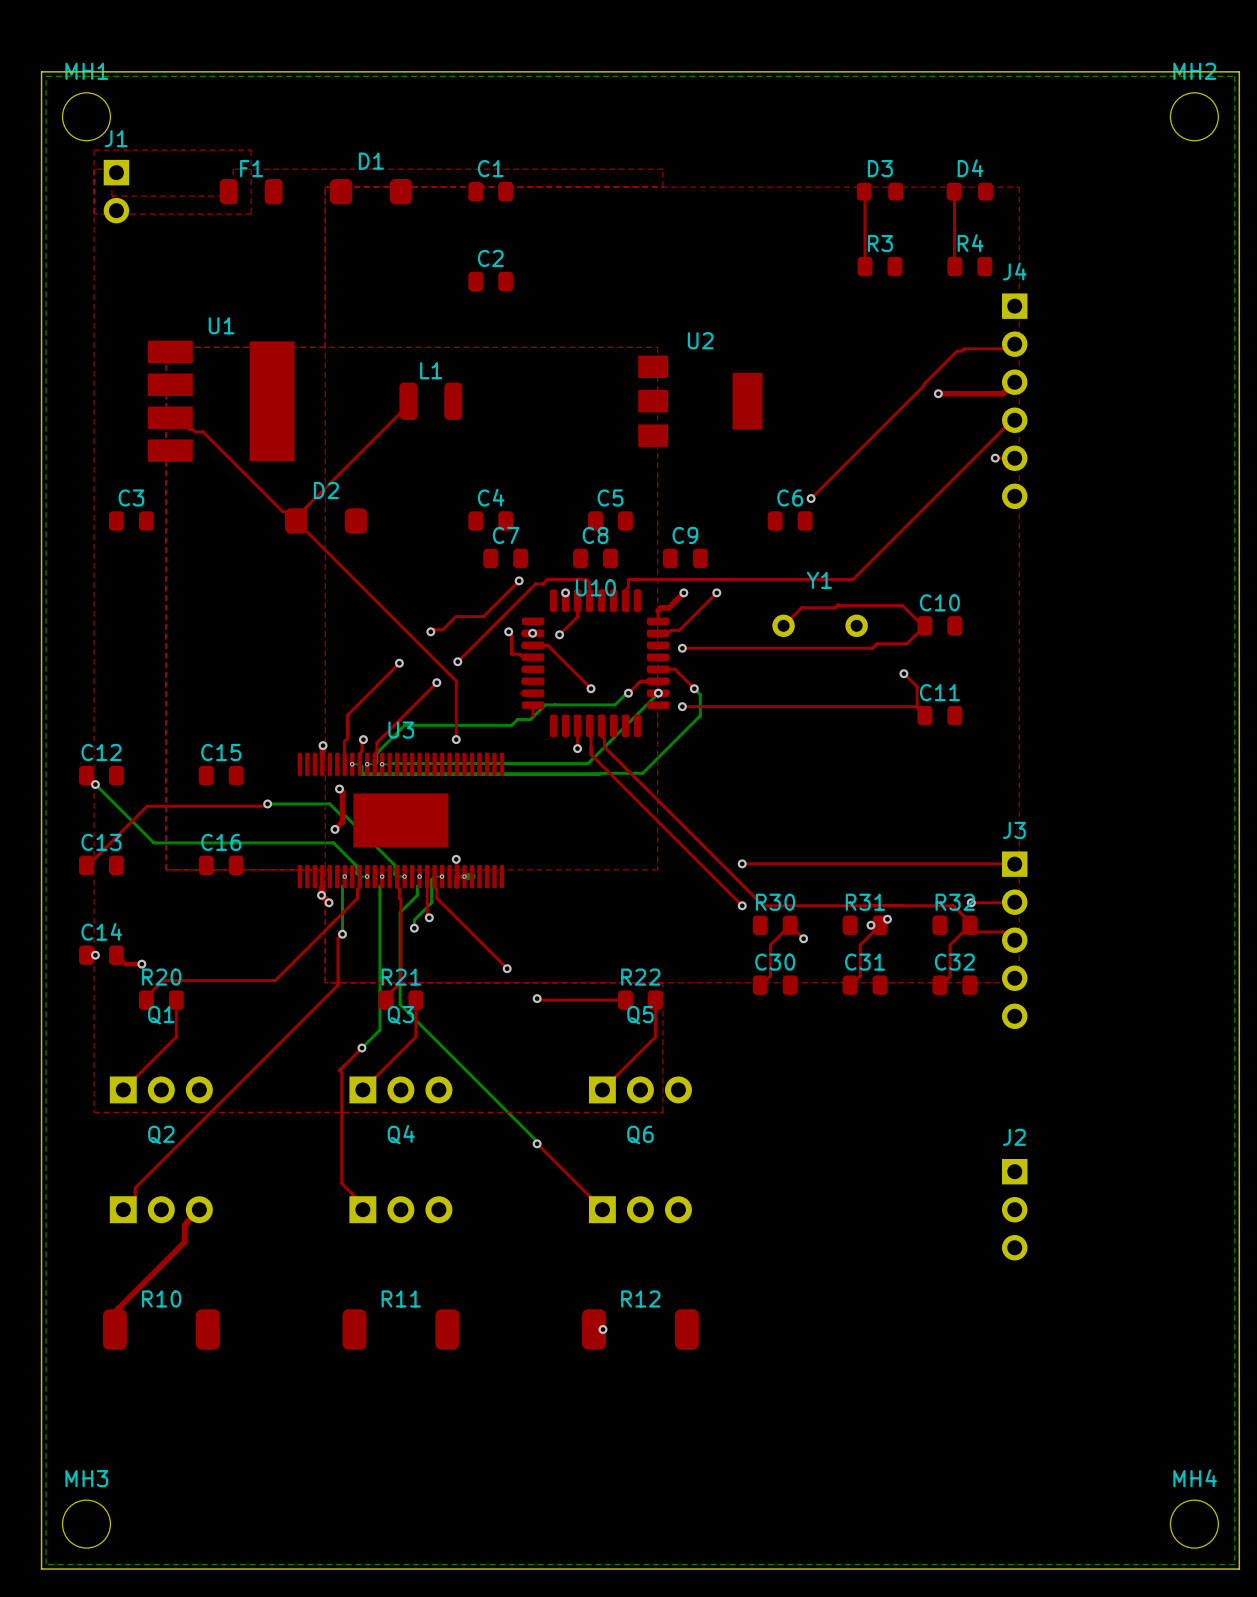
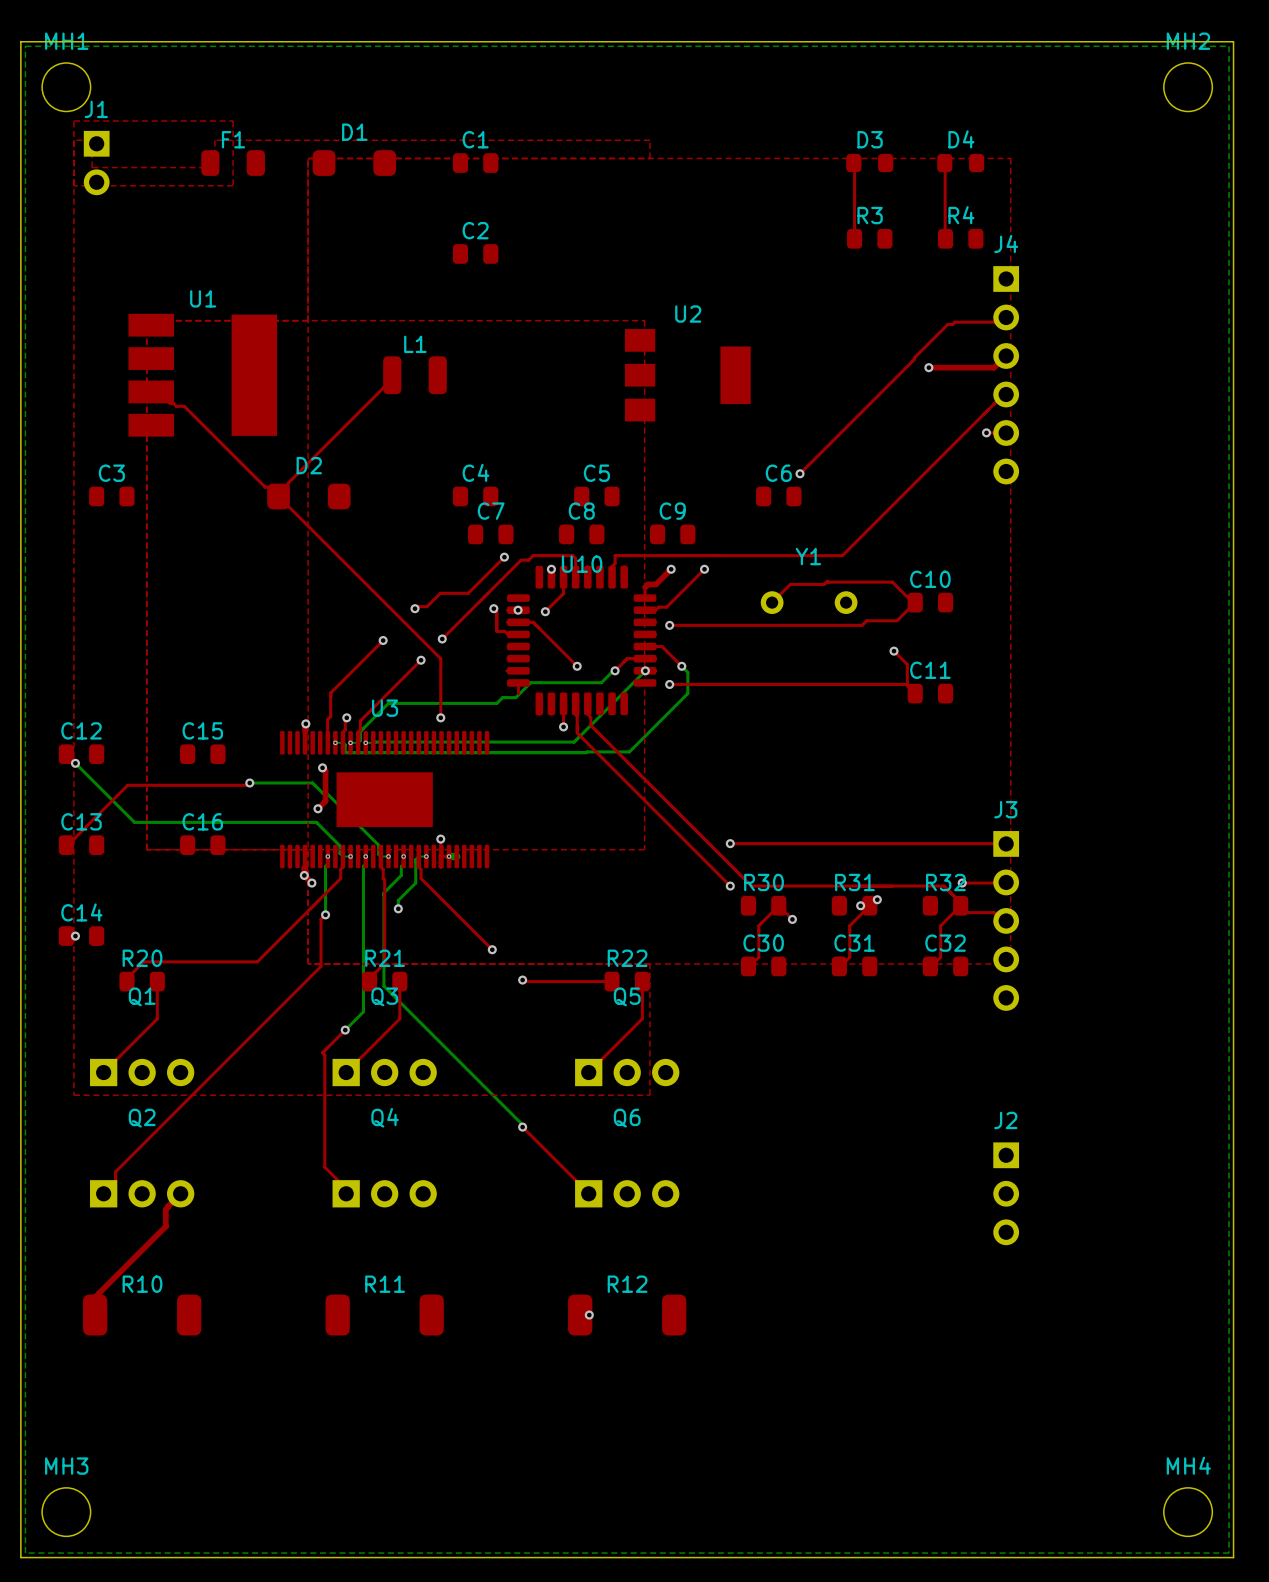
top track: (427, 876) (427, 915) (429, 917) -> none
via: (429, 917) -> none
top track: (116, 955) (125, 964) (141, 964) -> none
via: (141, 964) -> none

